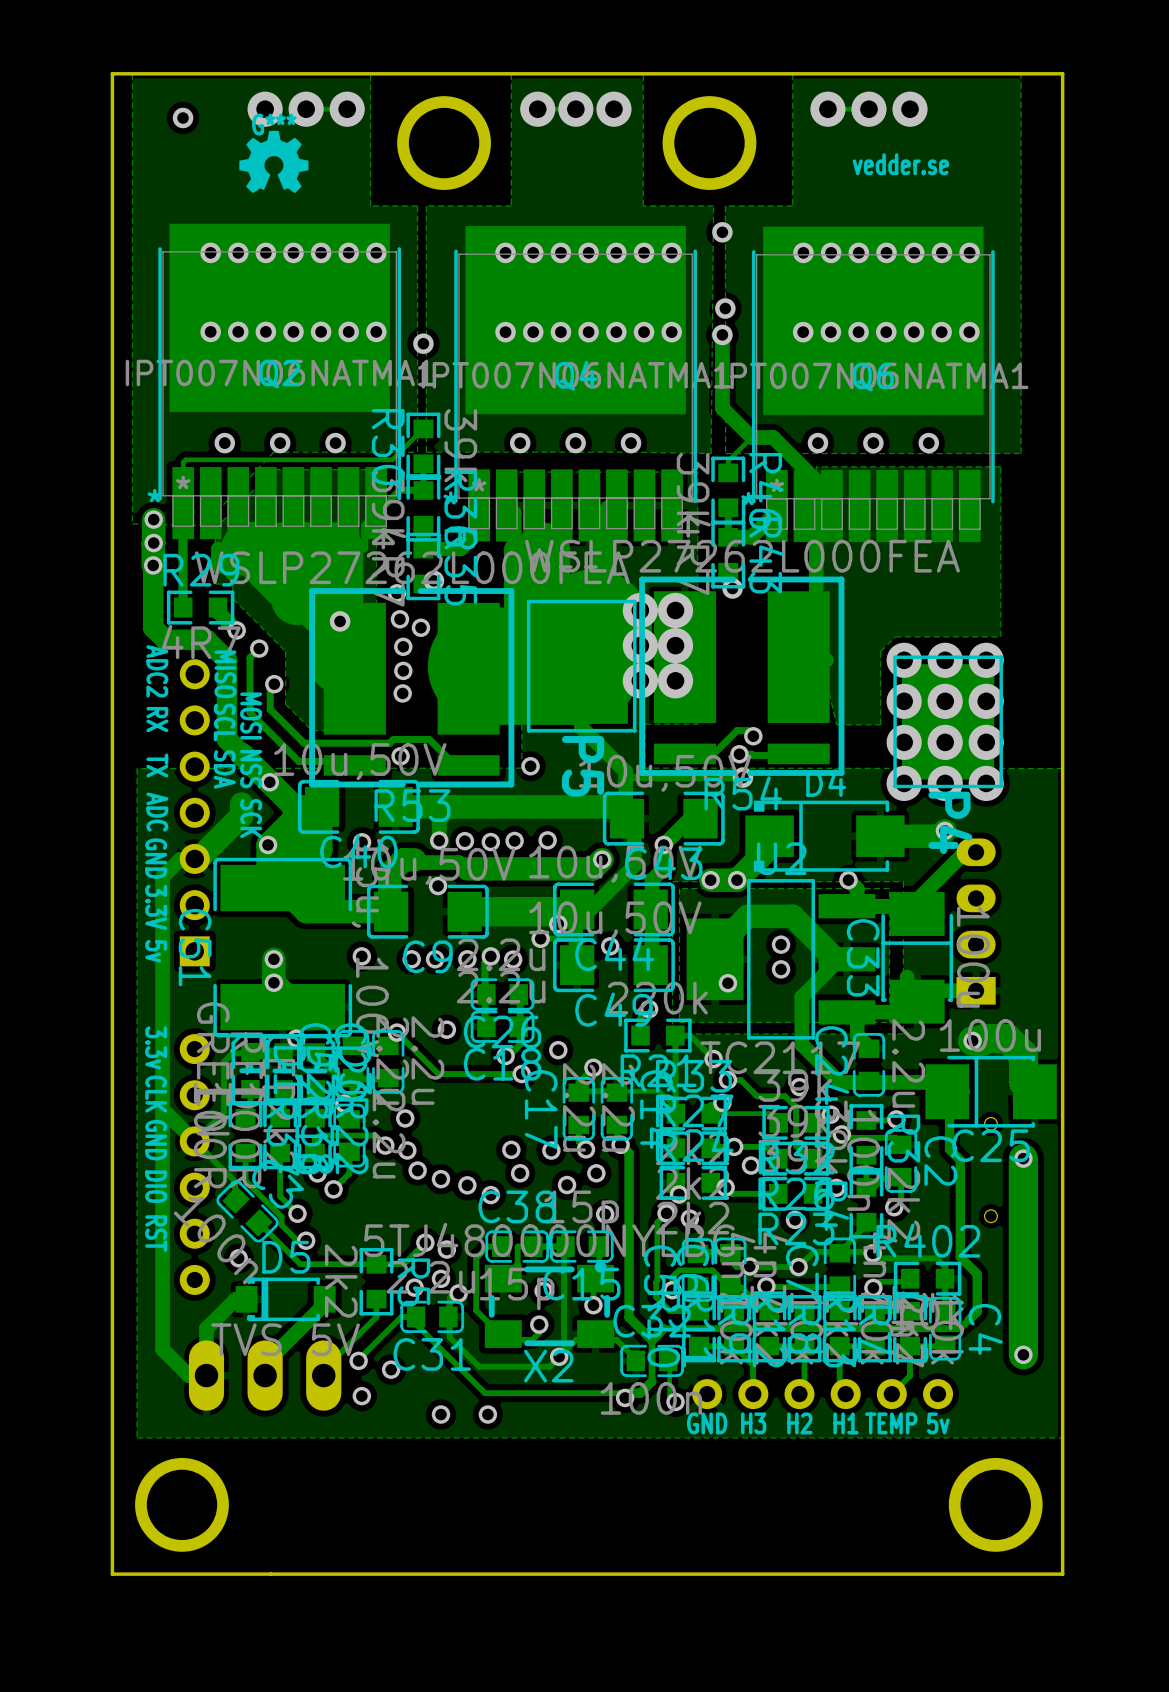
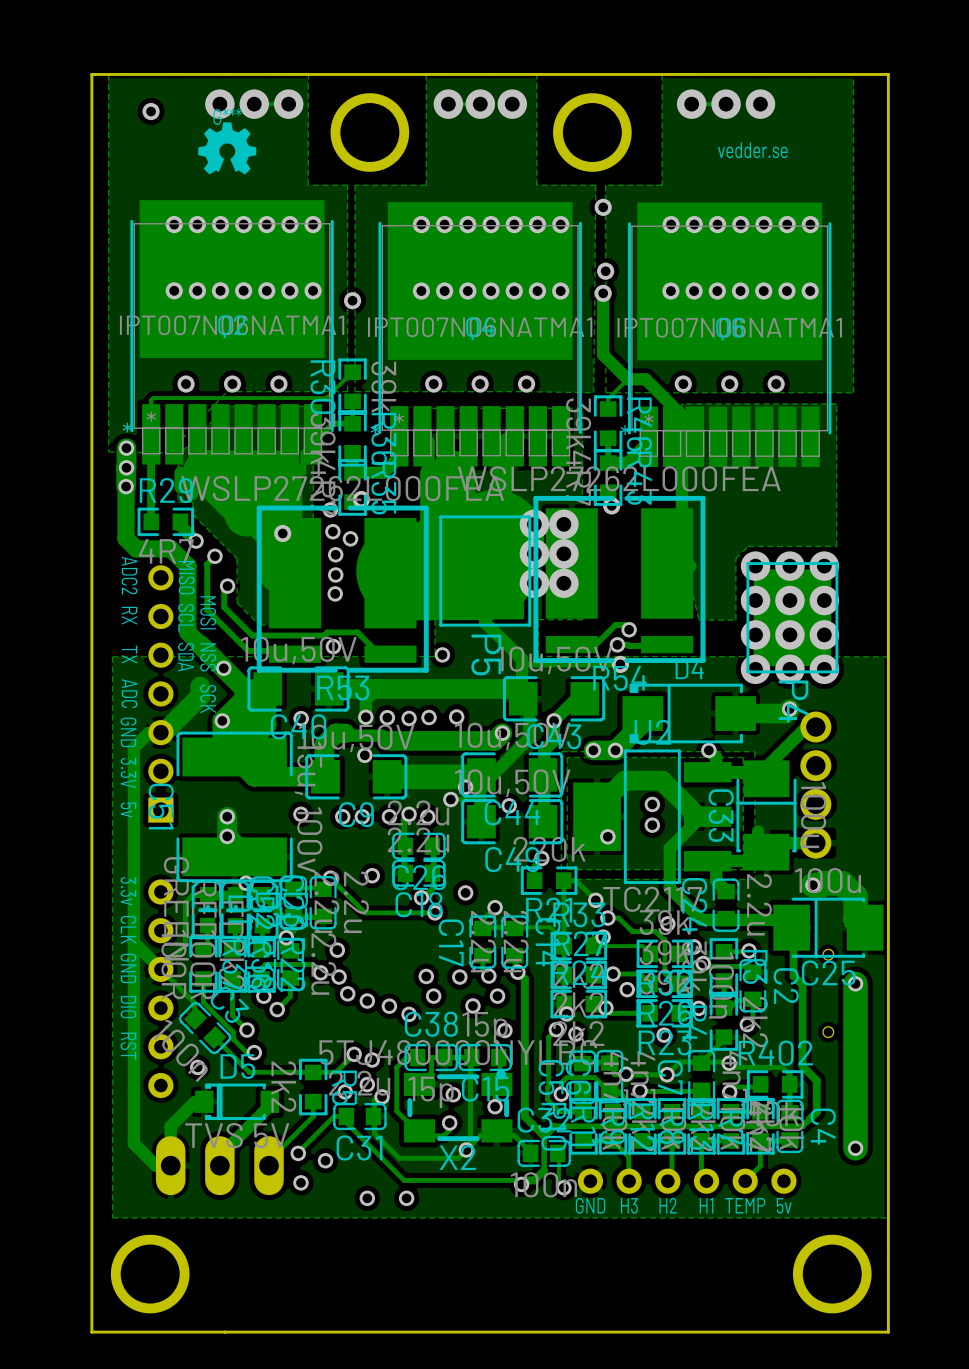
part footprint: [956, 838, 996, 1005] -> [800, 711, 832, 859]

